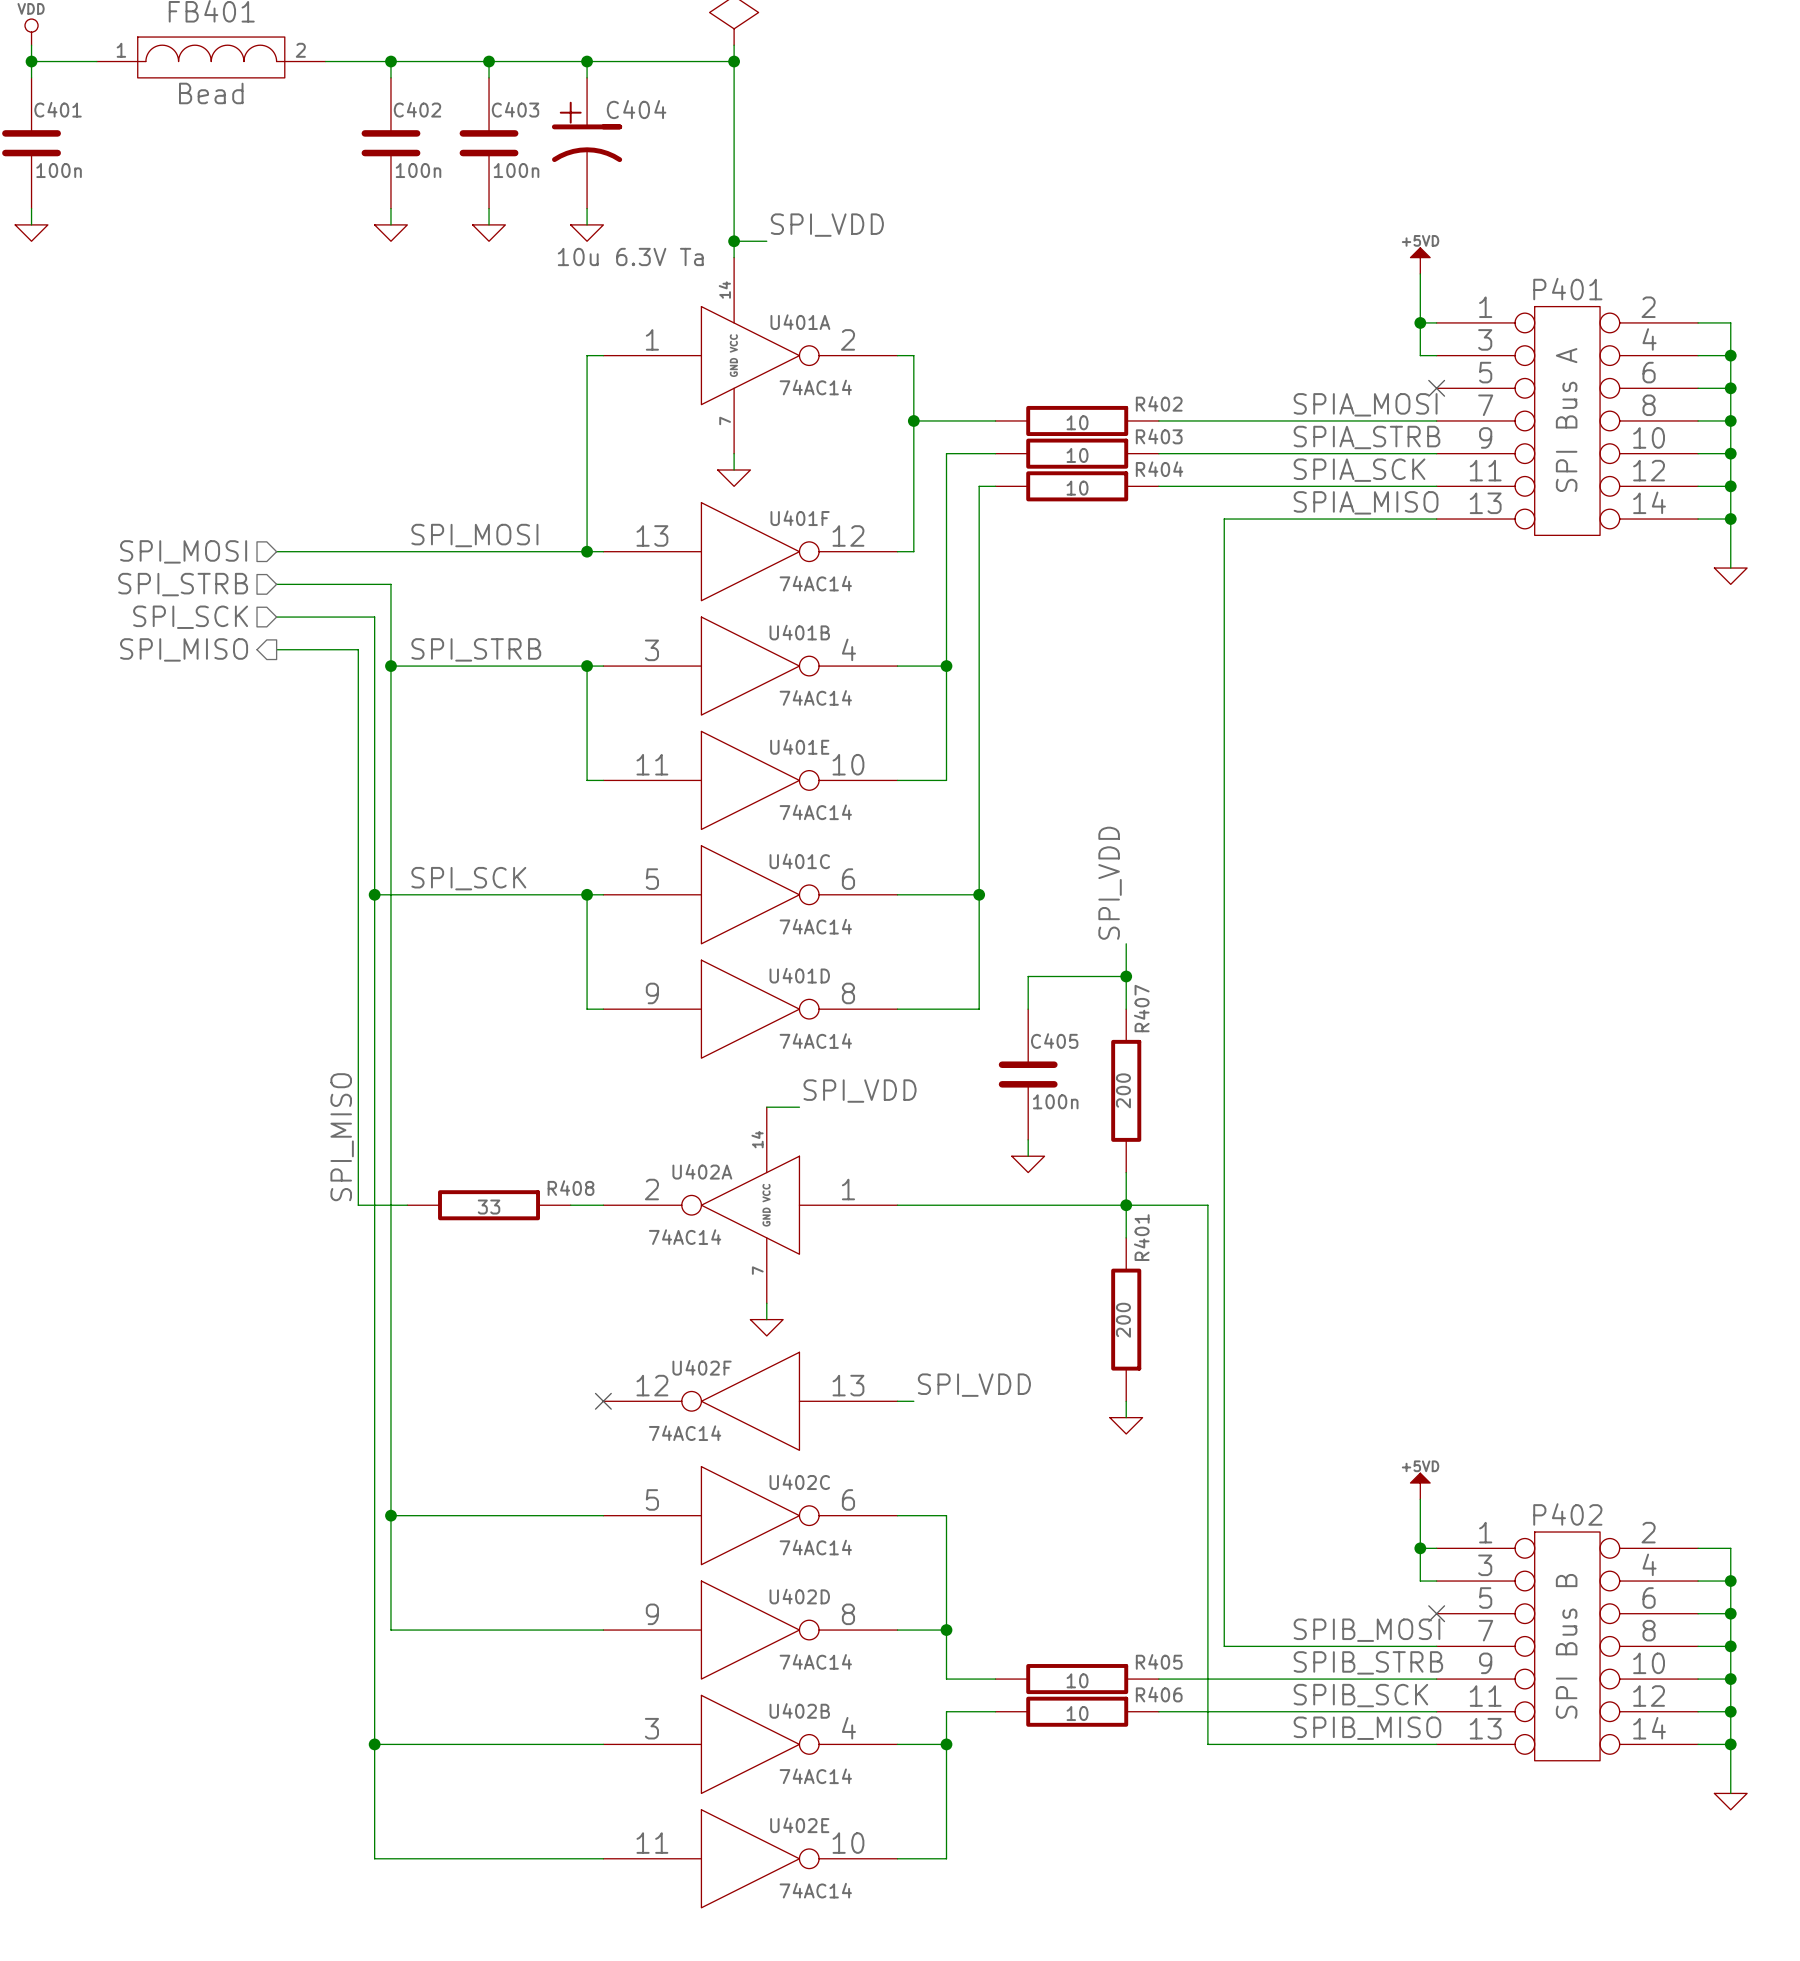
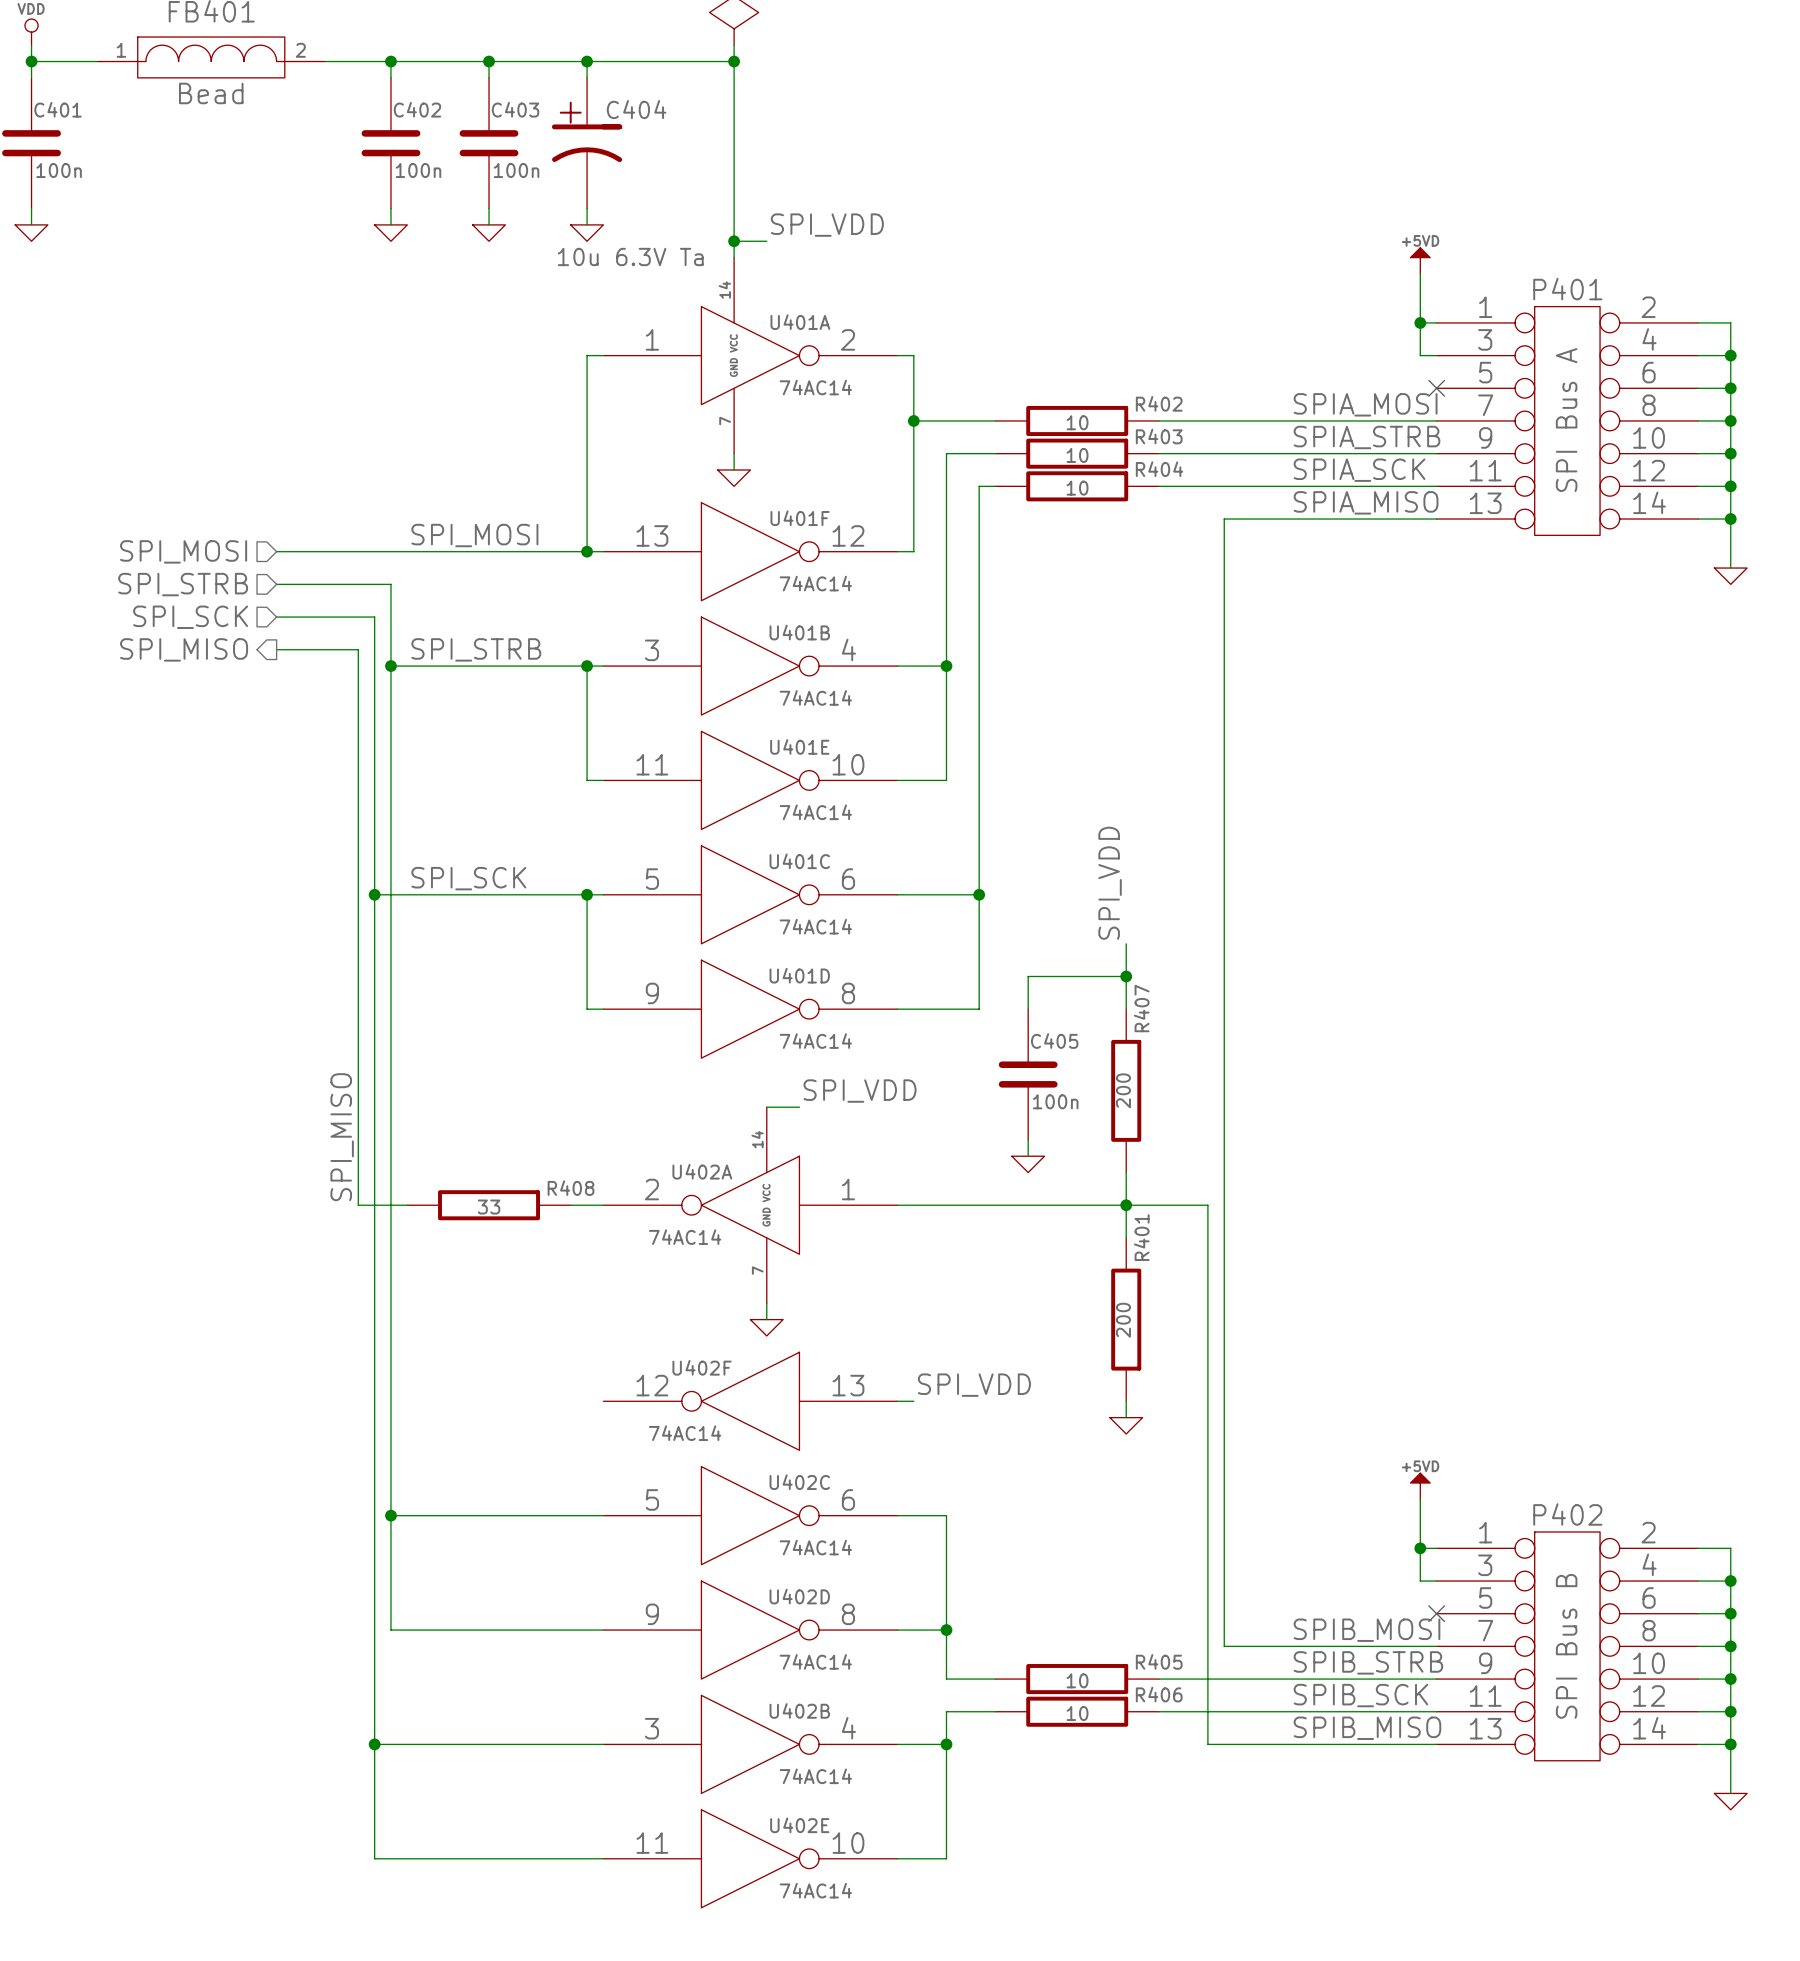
no-connect mark: (603, 1401) -> none

